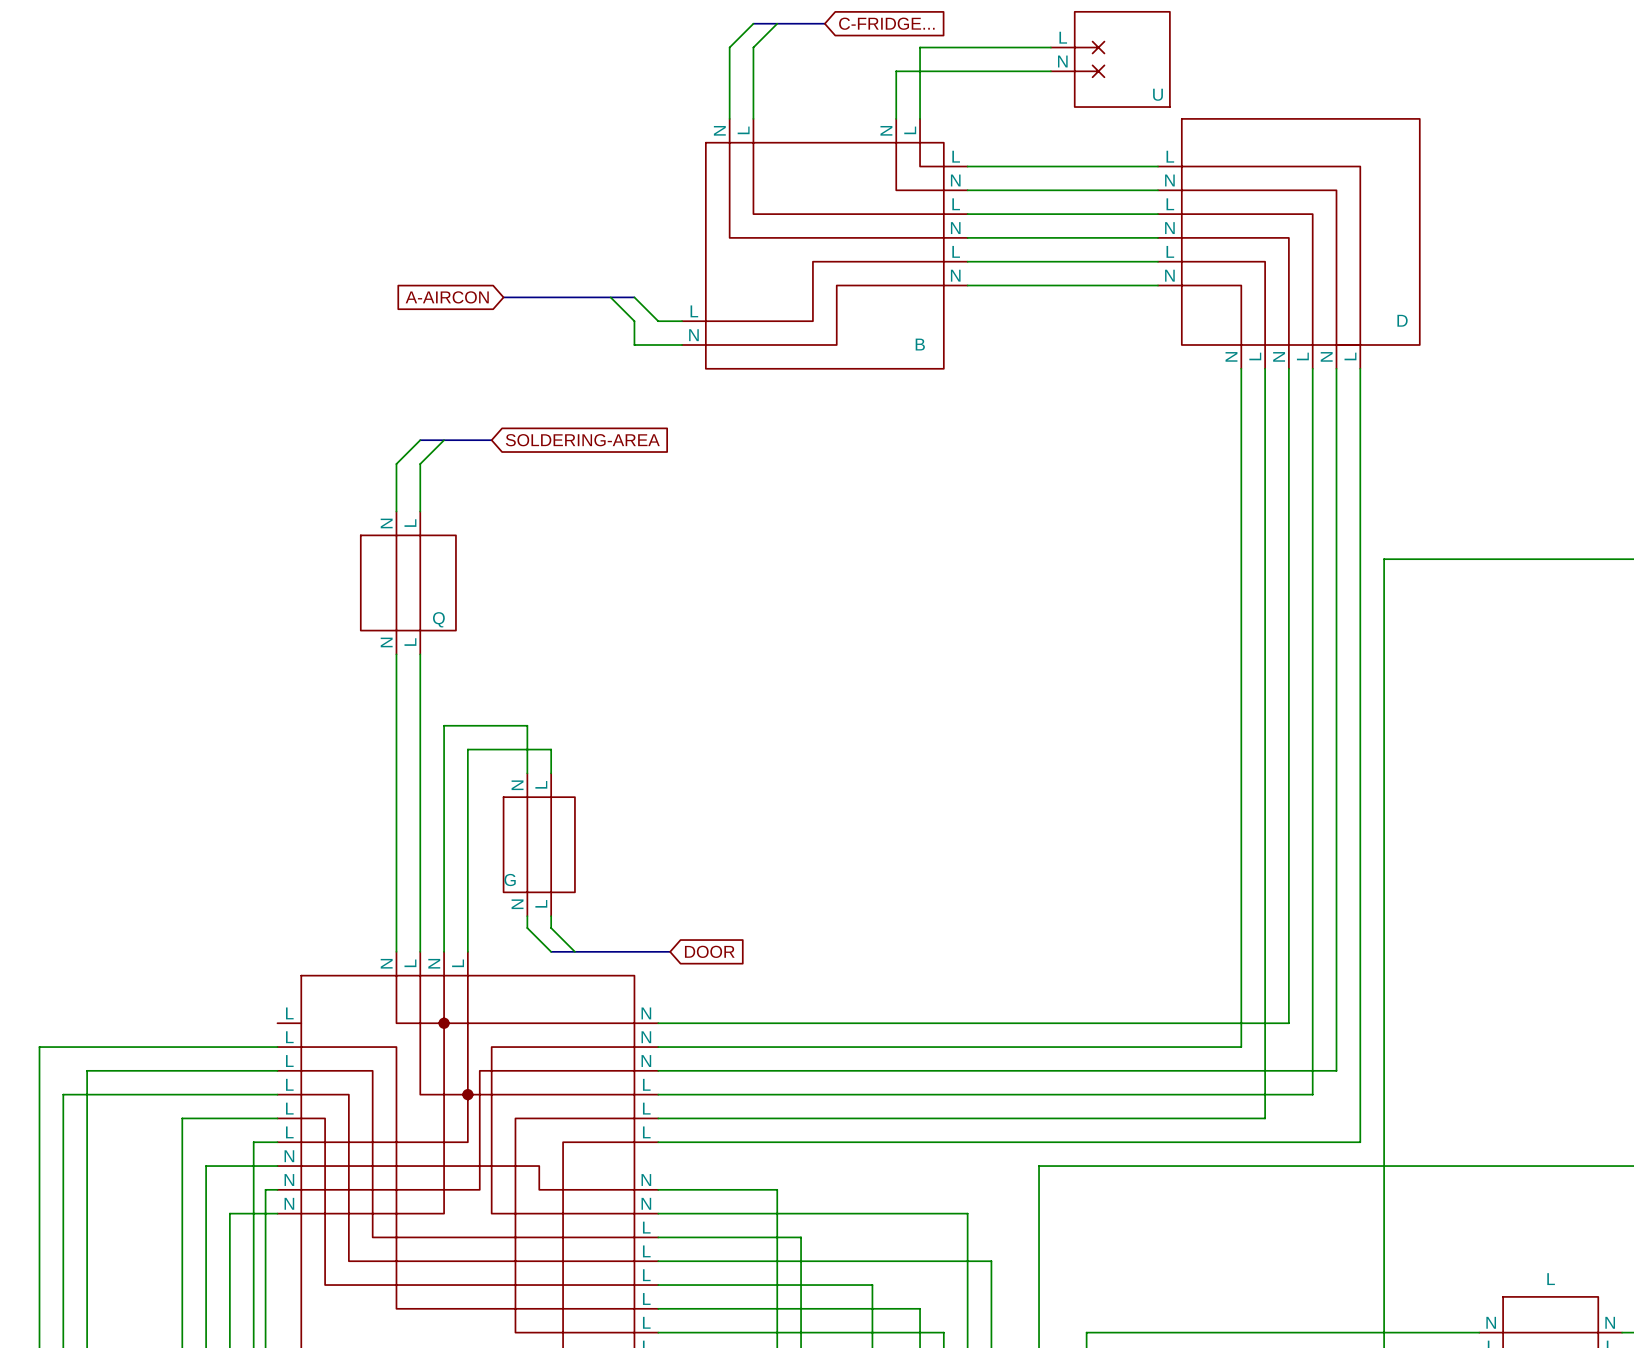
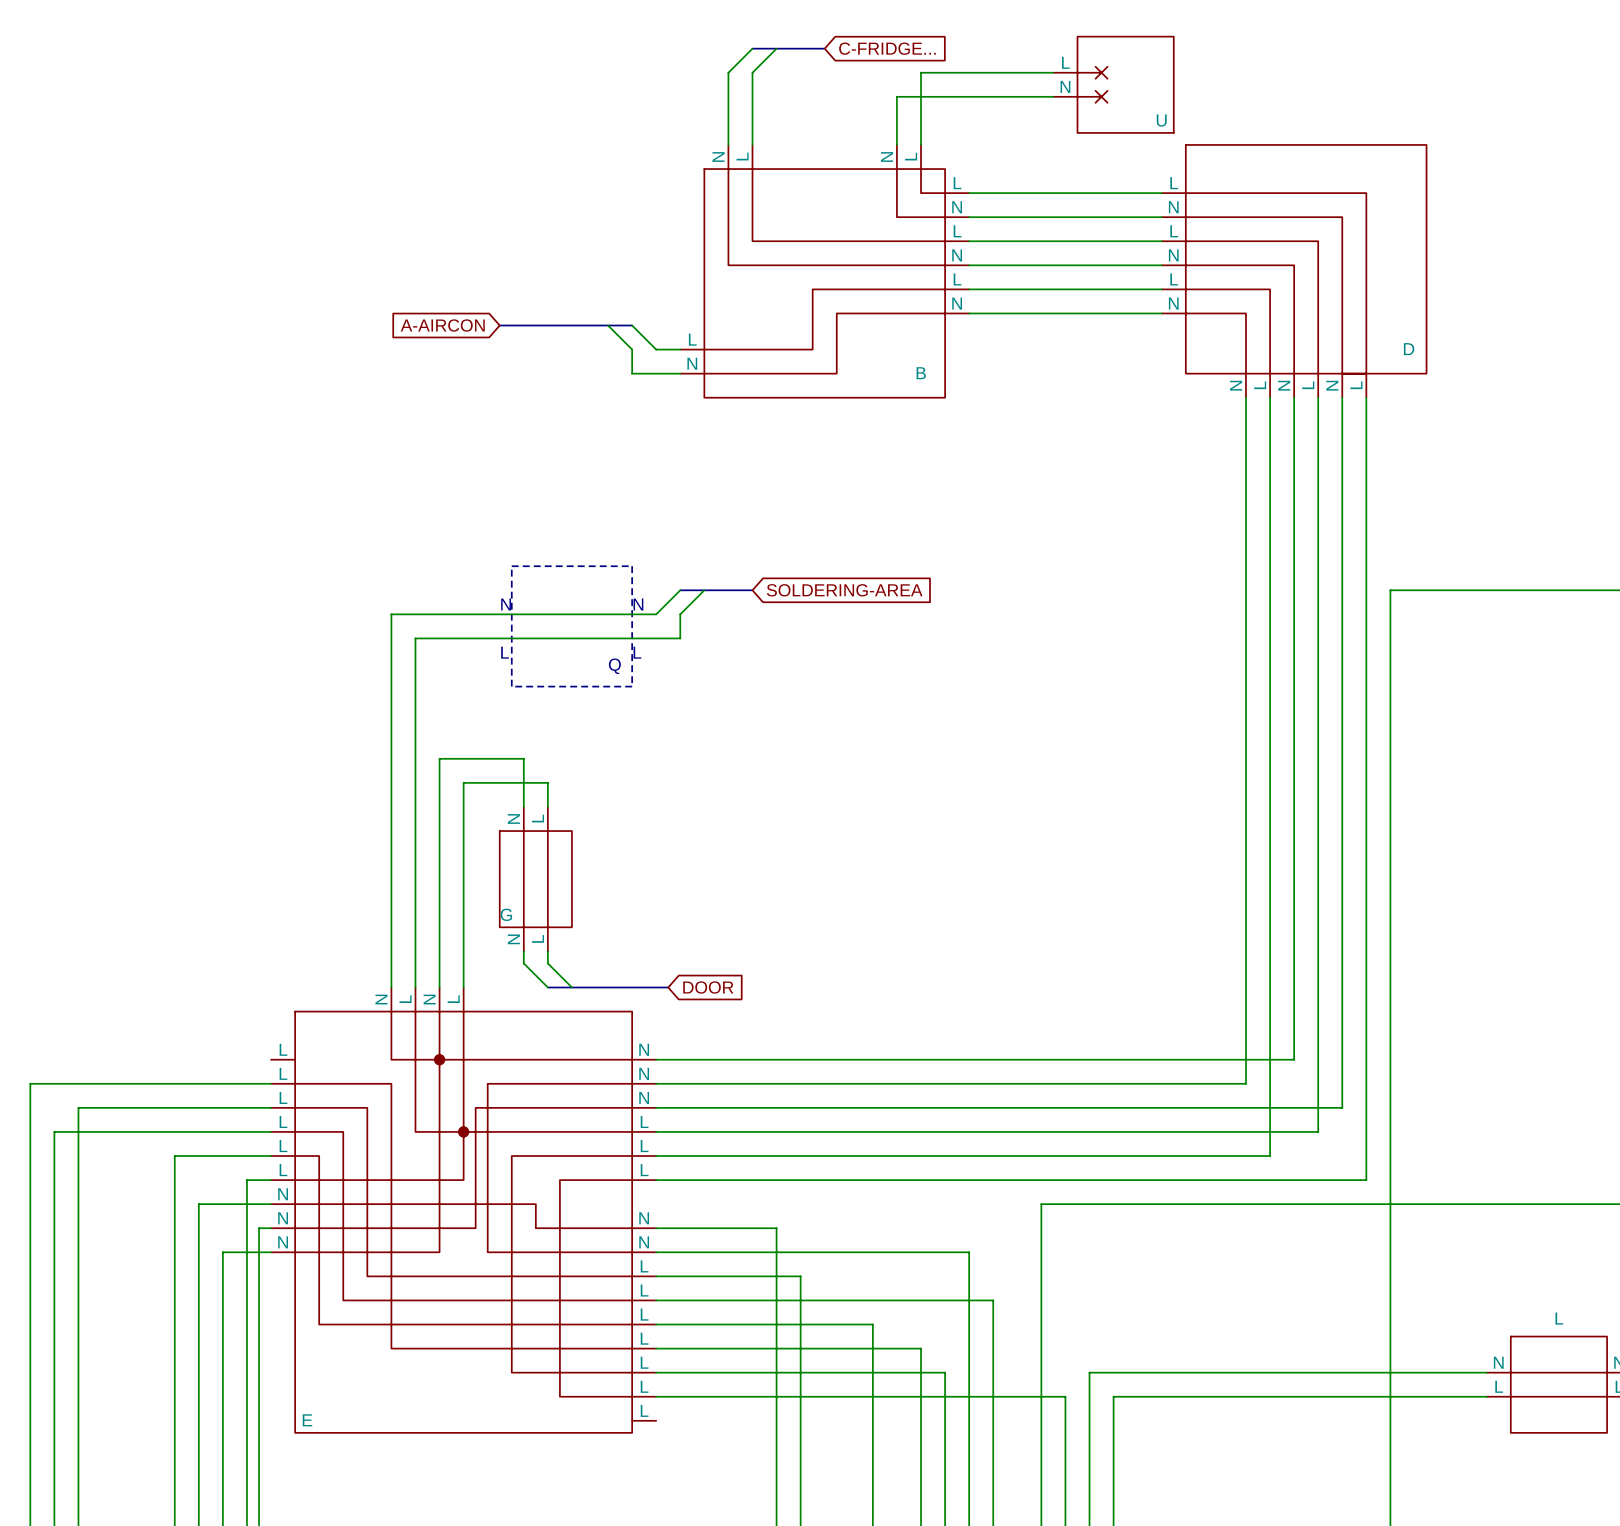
wire: (420, 440) (396, 463) (396, 511) -> none
bus: (420, 440) (491, 440) -> none
wire: (444, 440) (420, 463) (420, 511) -> none
global label: SOLDERING-AREA (582, 440) -> none
line: none -> (511, 566) (632, 566) (632, 686) (511, 686) (511, 566)
wire: none -> (680, 590) (656, 614) (391, 614) (391, 686)
bus: none -> (680, 590) (752, 590)
wire: none -> (704, 590) (680, 614) (680, 638) (415, 638) (415, 686)
global label: none -> SOLDERING-AREA (844, 590)
text: none -> N (506, 604)
text: none -> N (638, 604)
part: Q (408, 582) -> none
text: none -> L (505, 652)
text: none -> L (637, 652)
text: none -> Q (614, 666)

